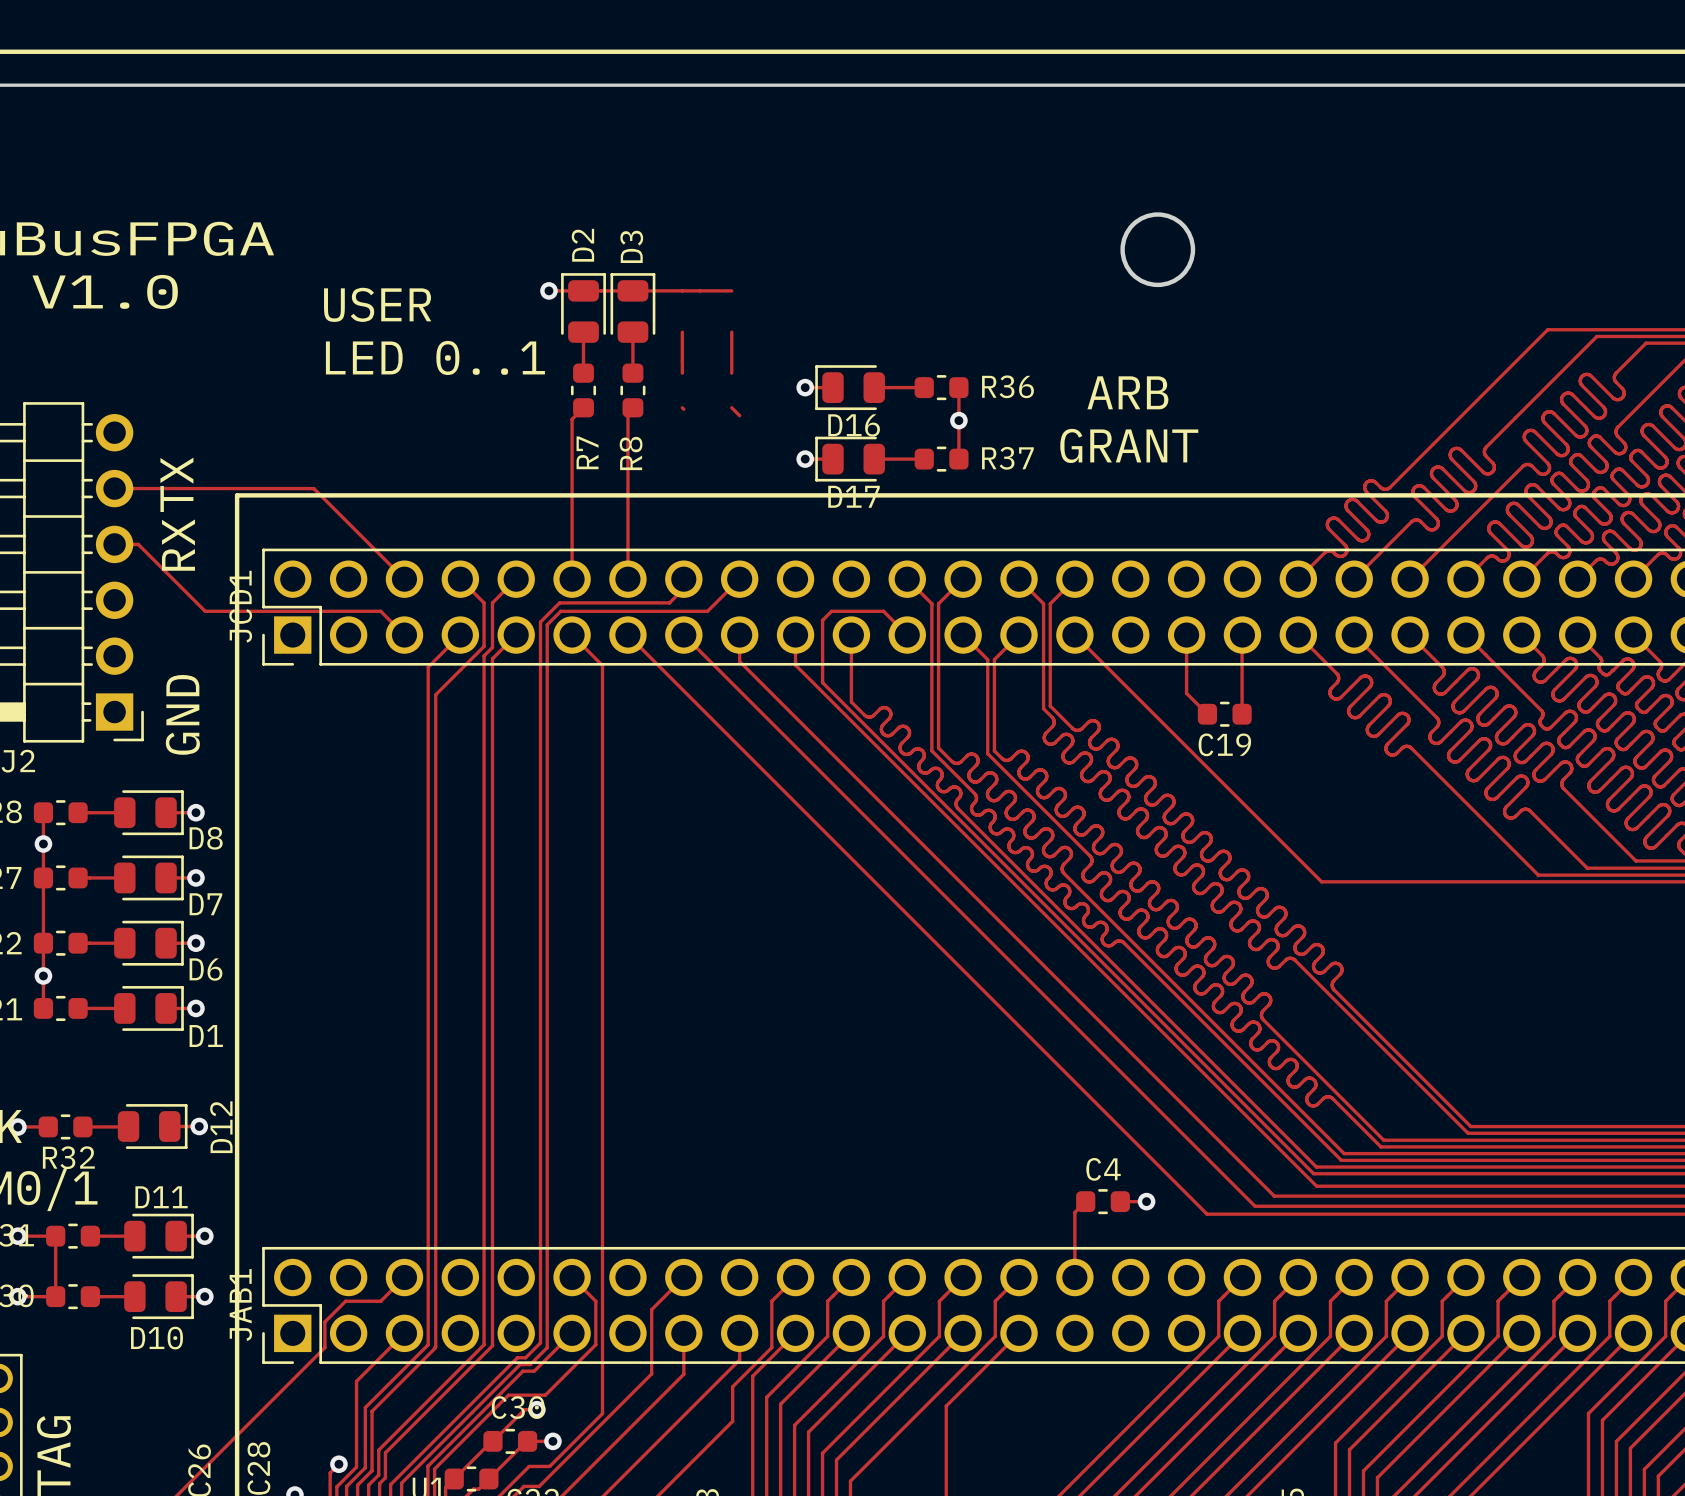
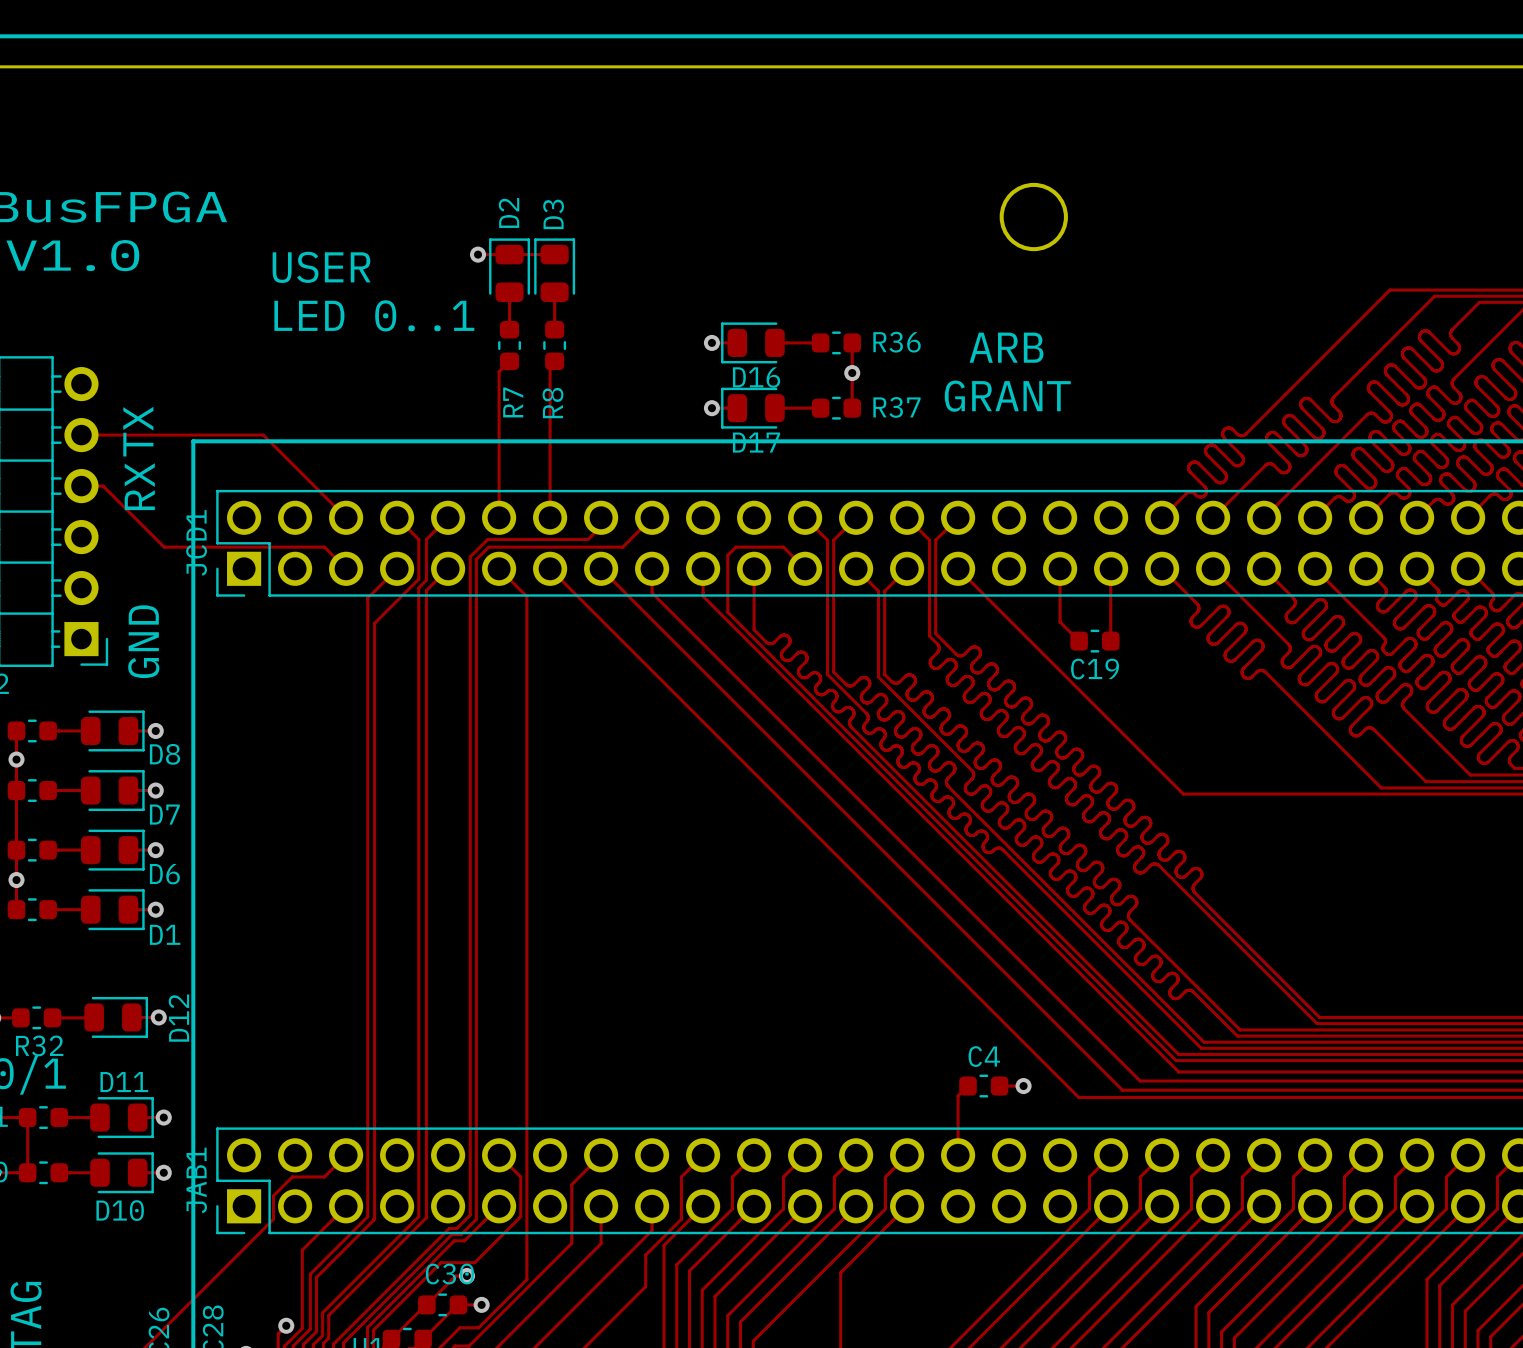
track: (632, 290) (731, 290) -> none
track: (682, 332) (682, 373) -> none
track: (731, 332) (731, 373) -> none
track: (682, 407) (683, 409) -> none
track: (731, 407) (739, 415) -> none

